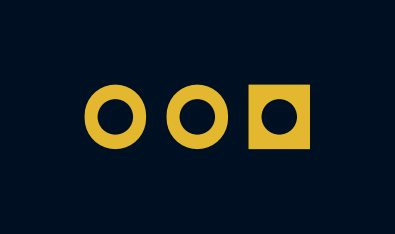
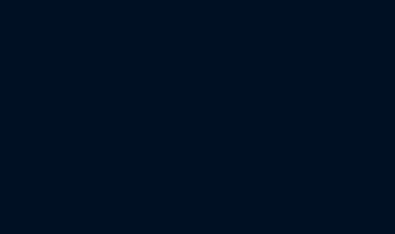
part: (197, 116) -> none

